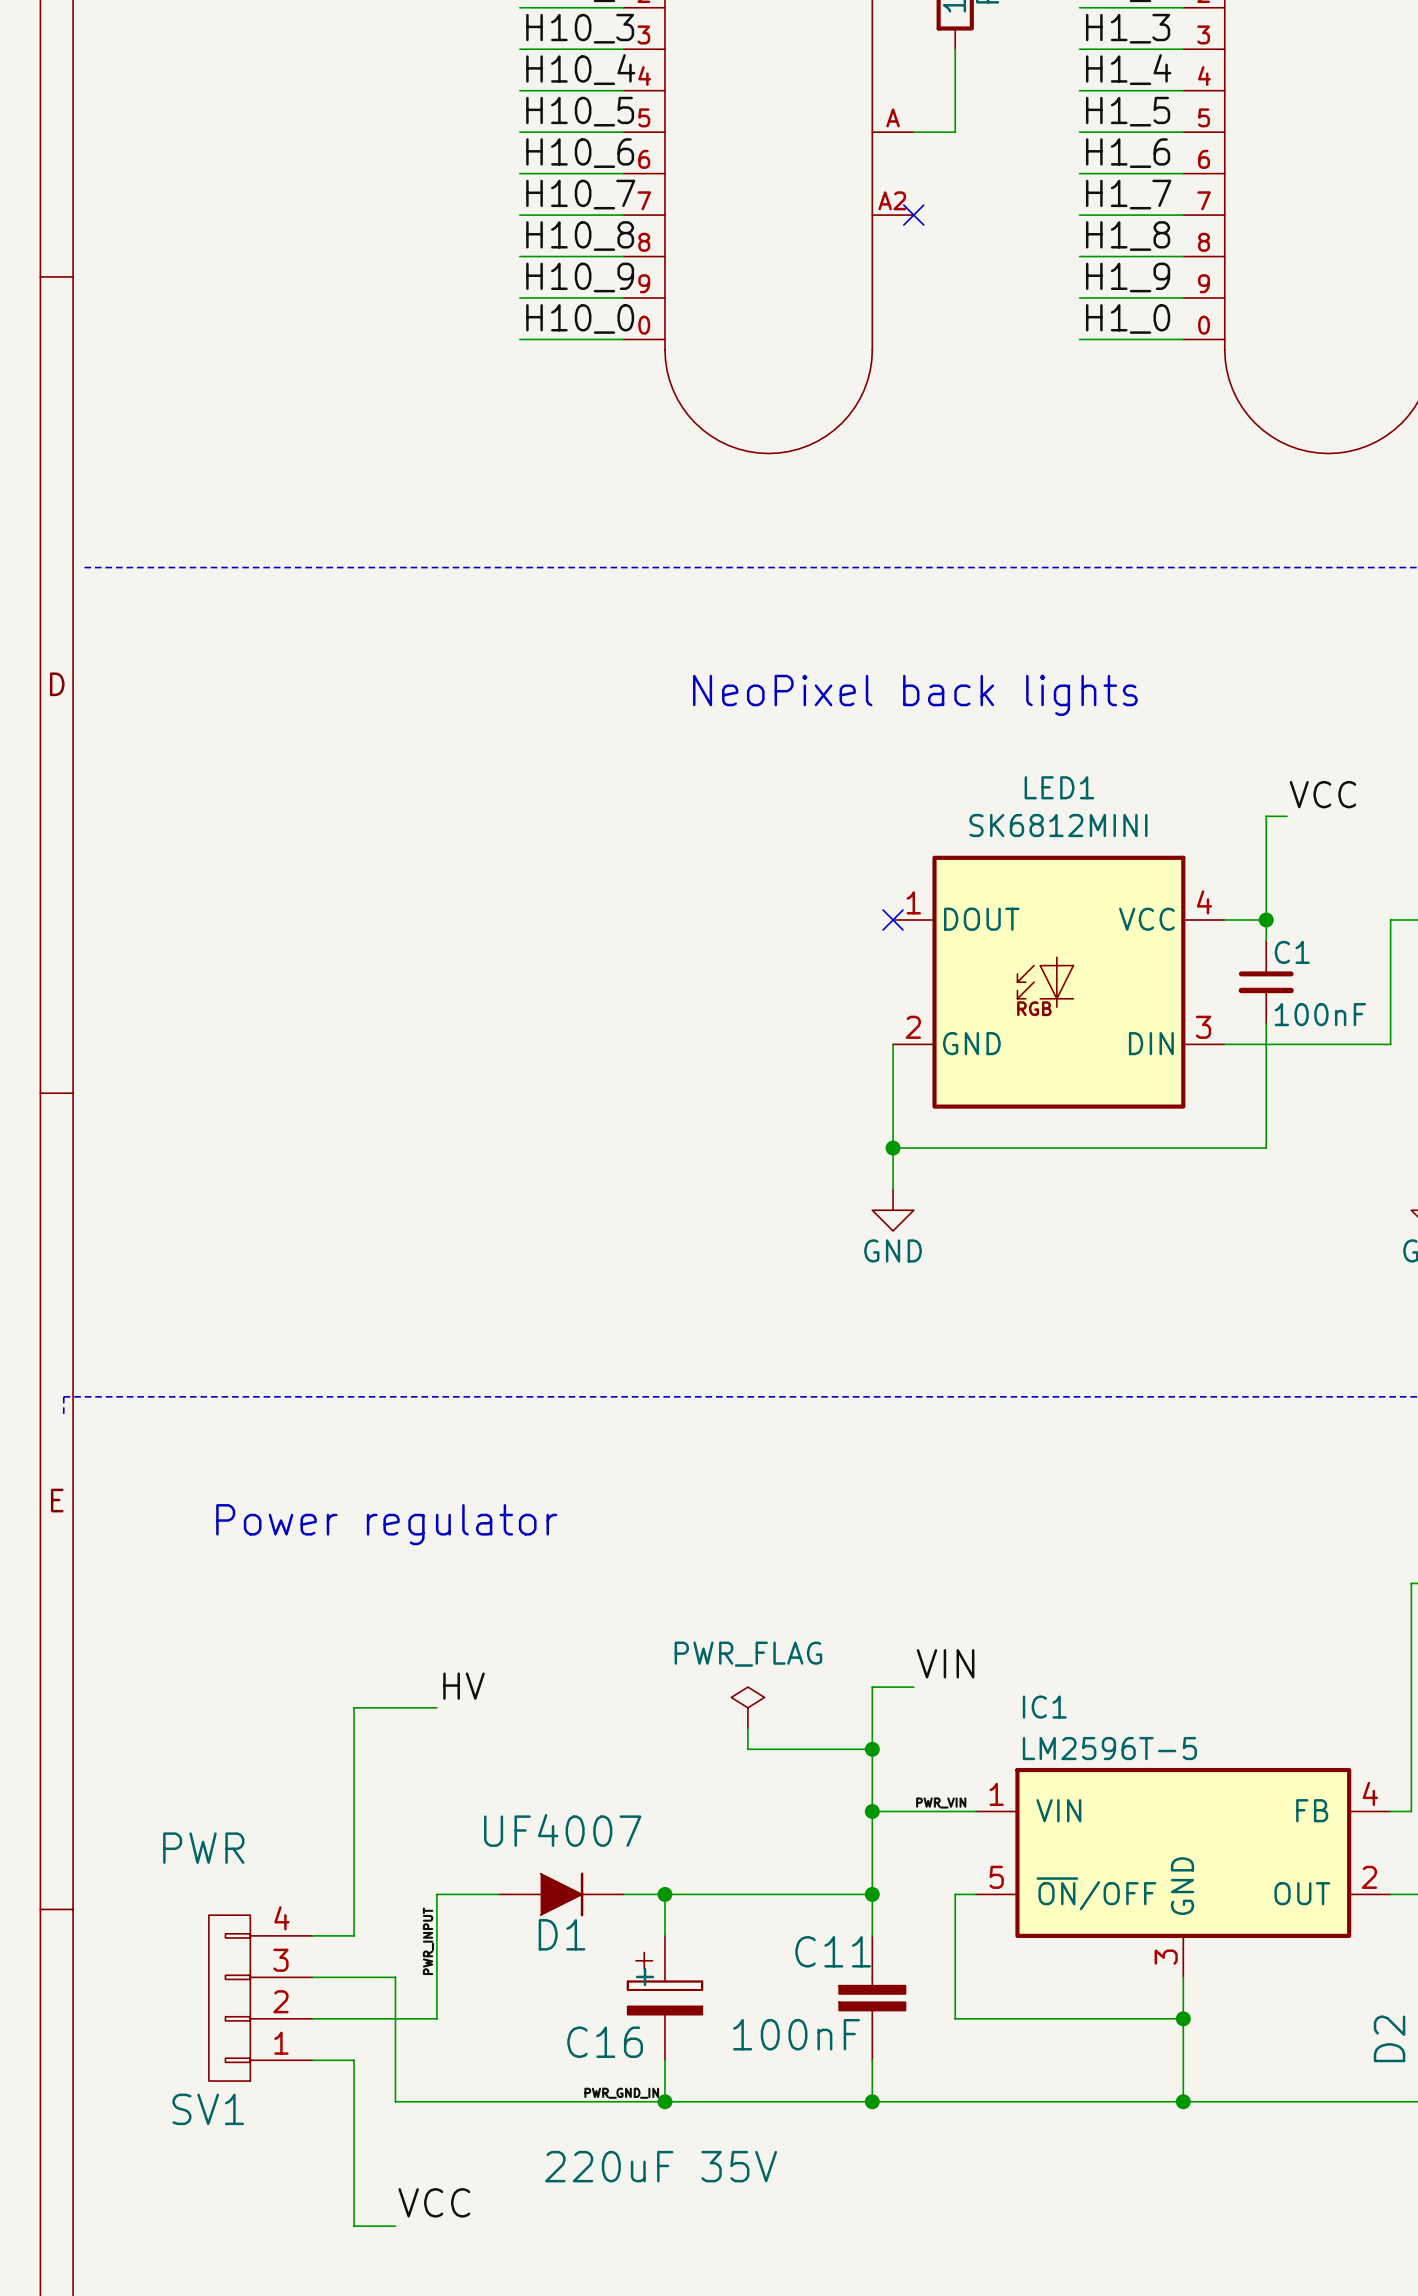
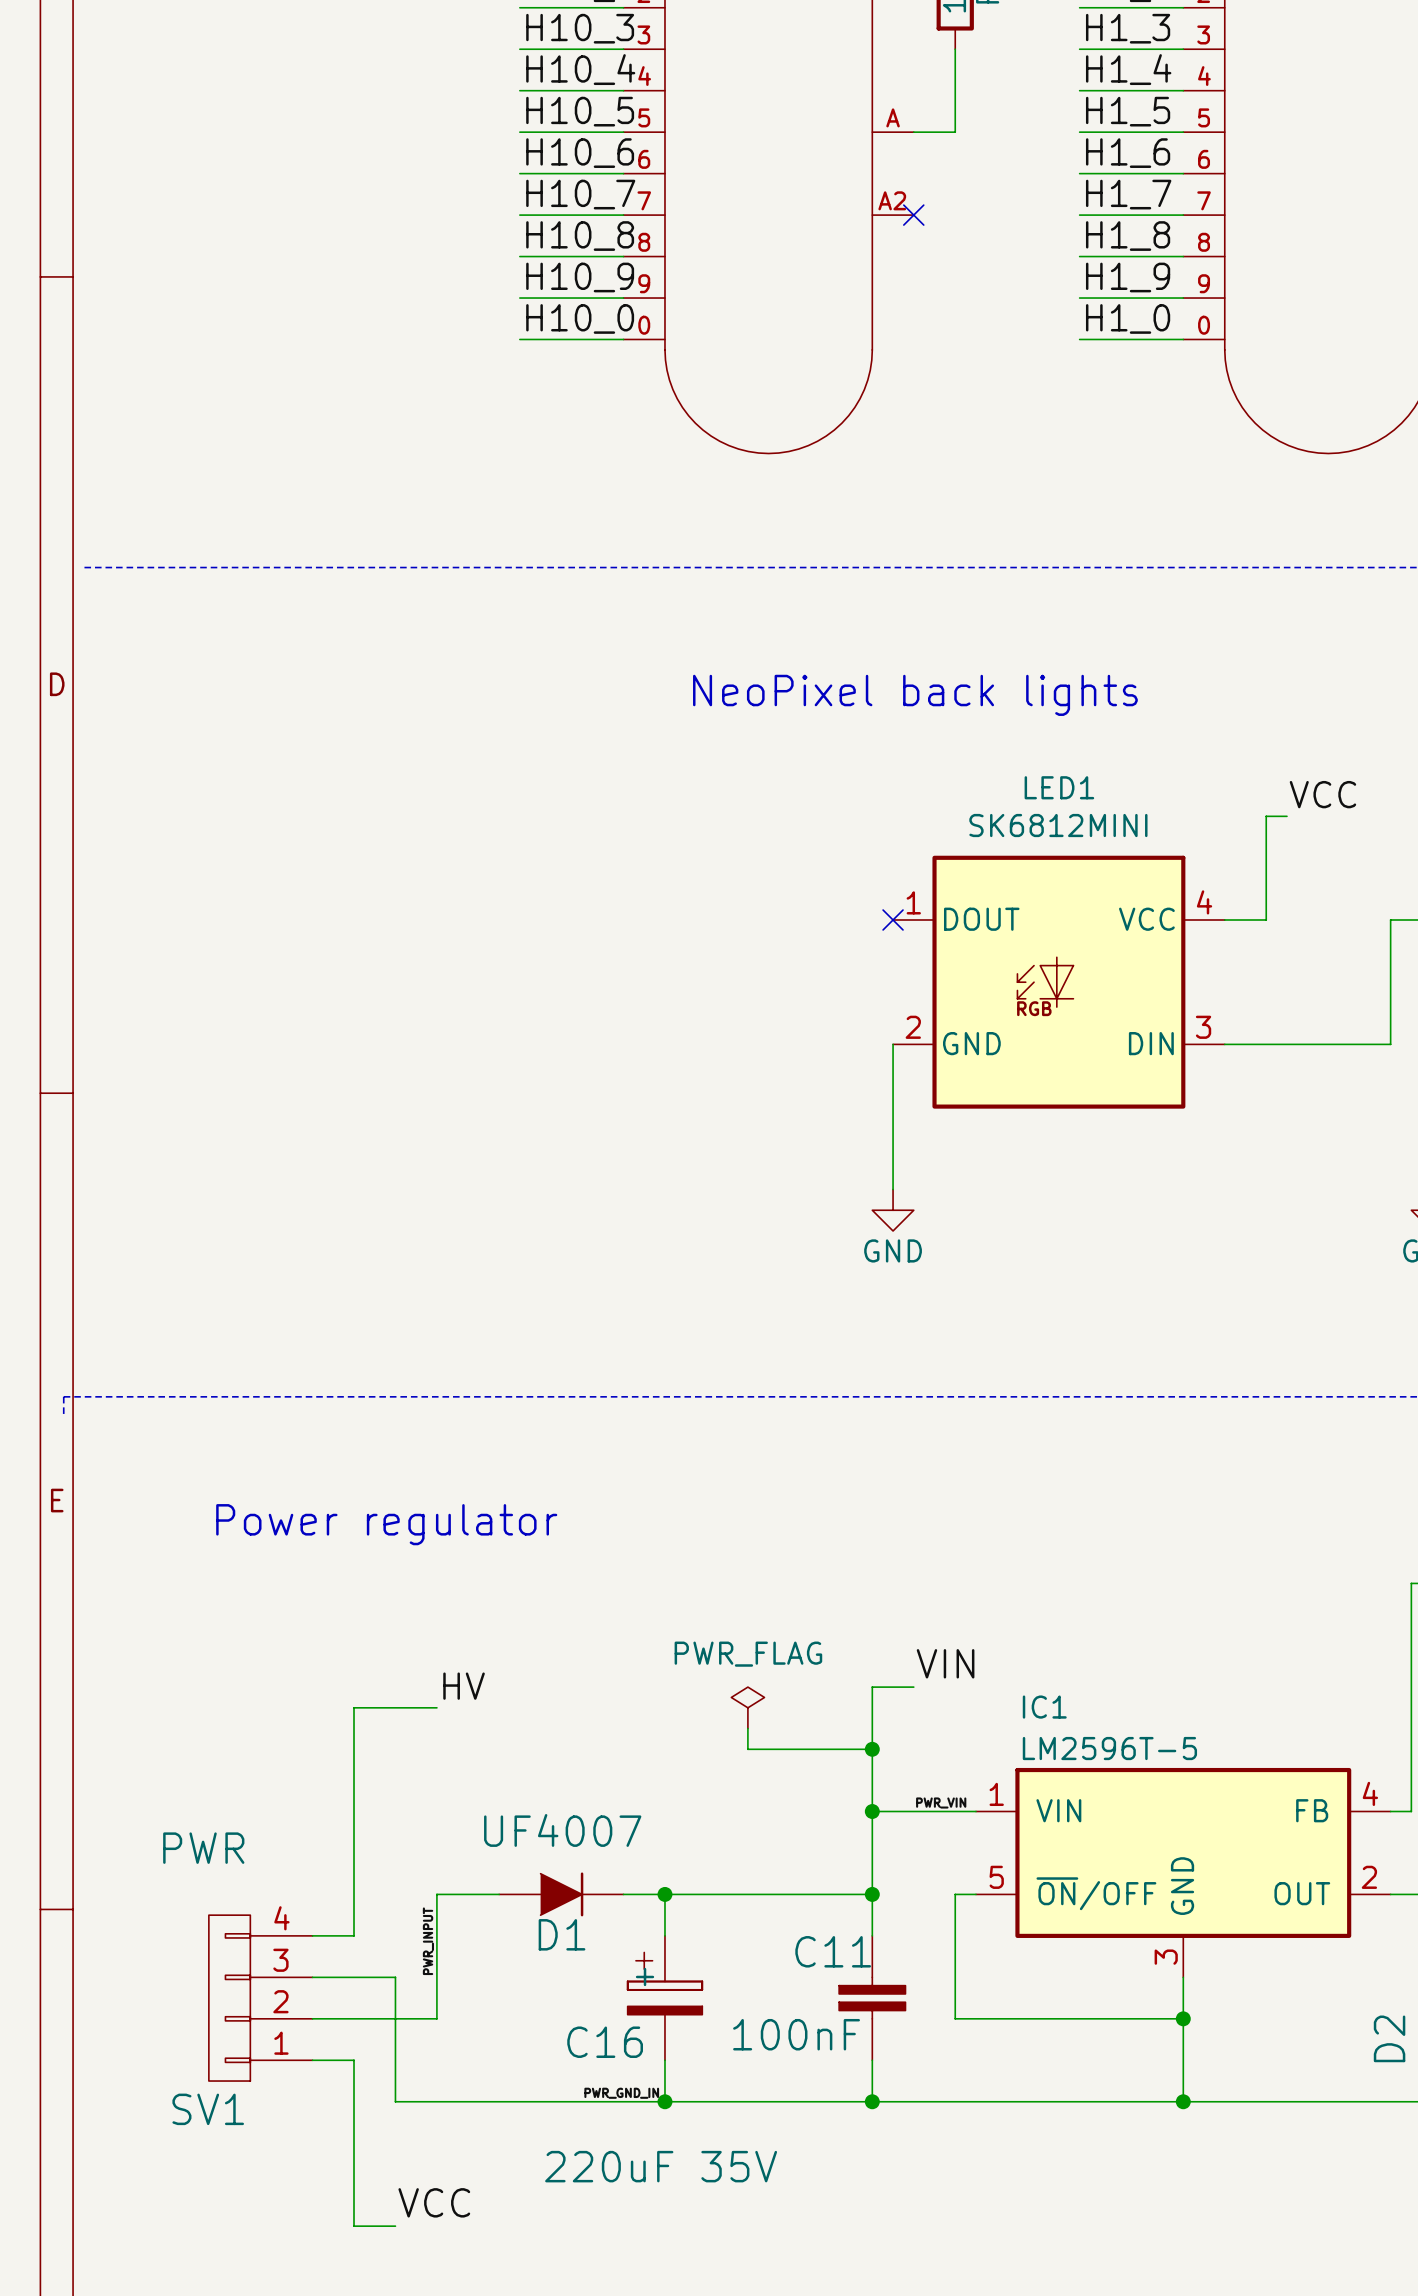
wire: (1266, 919) (1266, 940) -> none
junction: (1266, 919) -> none
C1: 100nF (1266, 982) -> none
wire: (1266, 1023) (1266, 1148) (893, 1148) -> none
junction: (893, 1148) -> none

